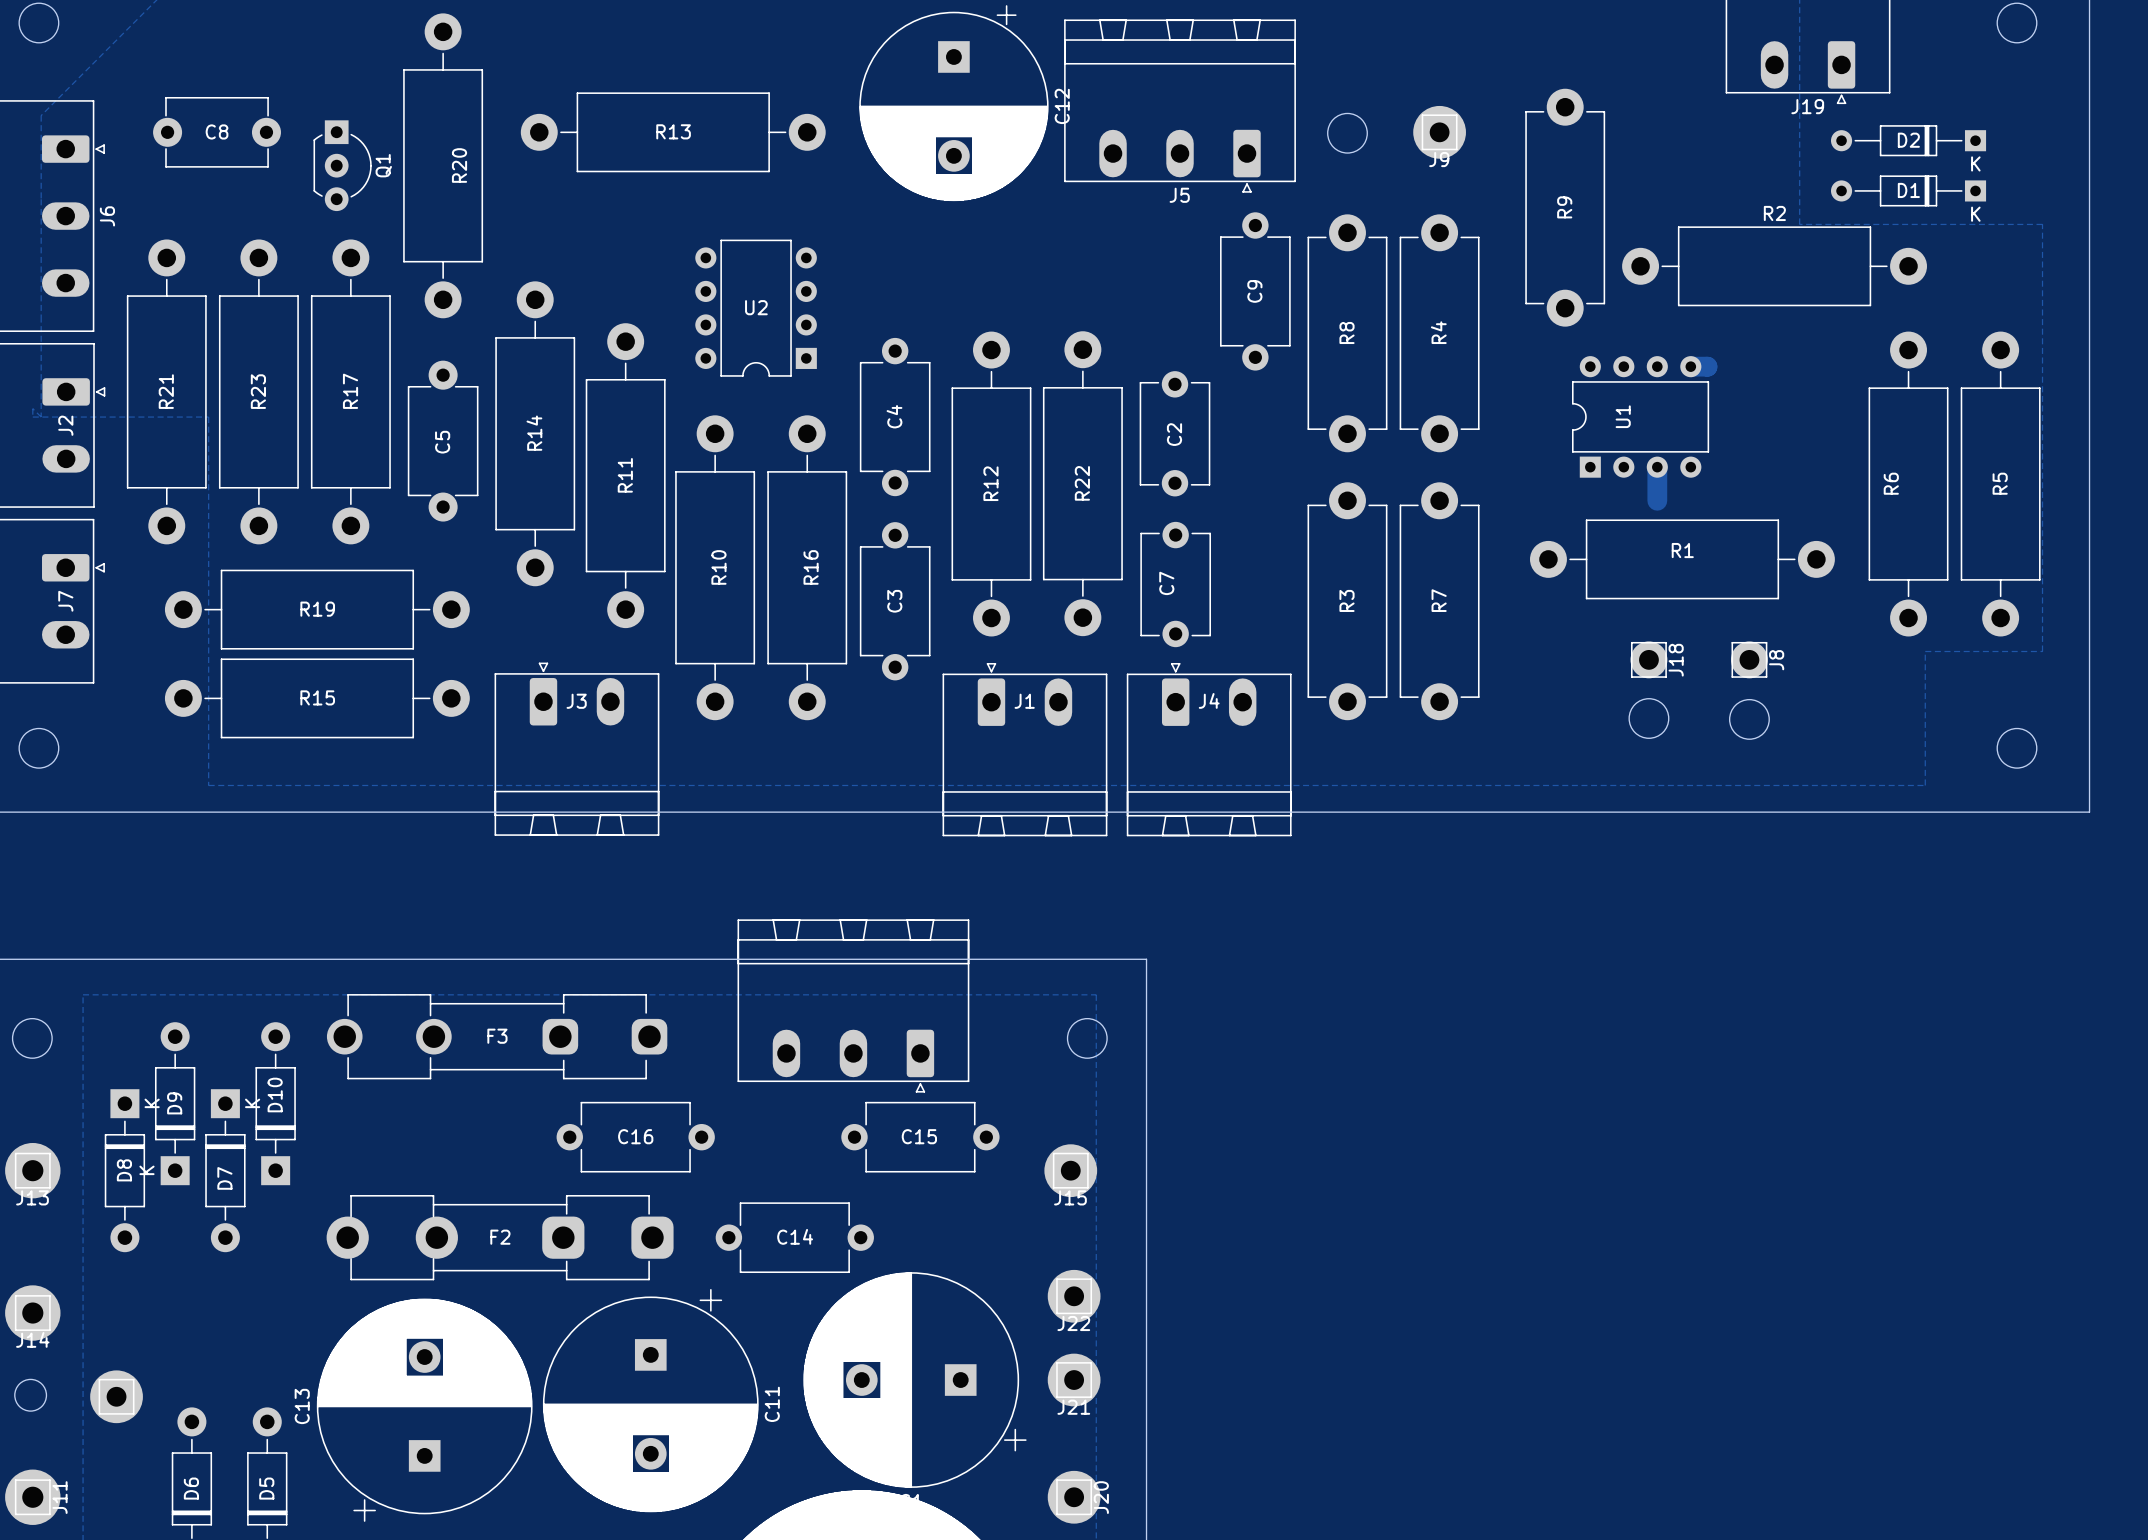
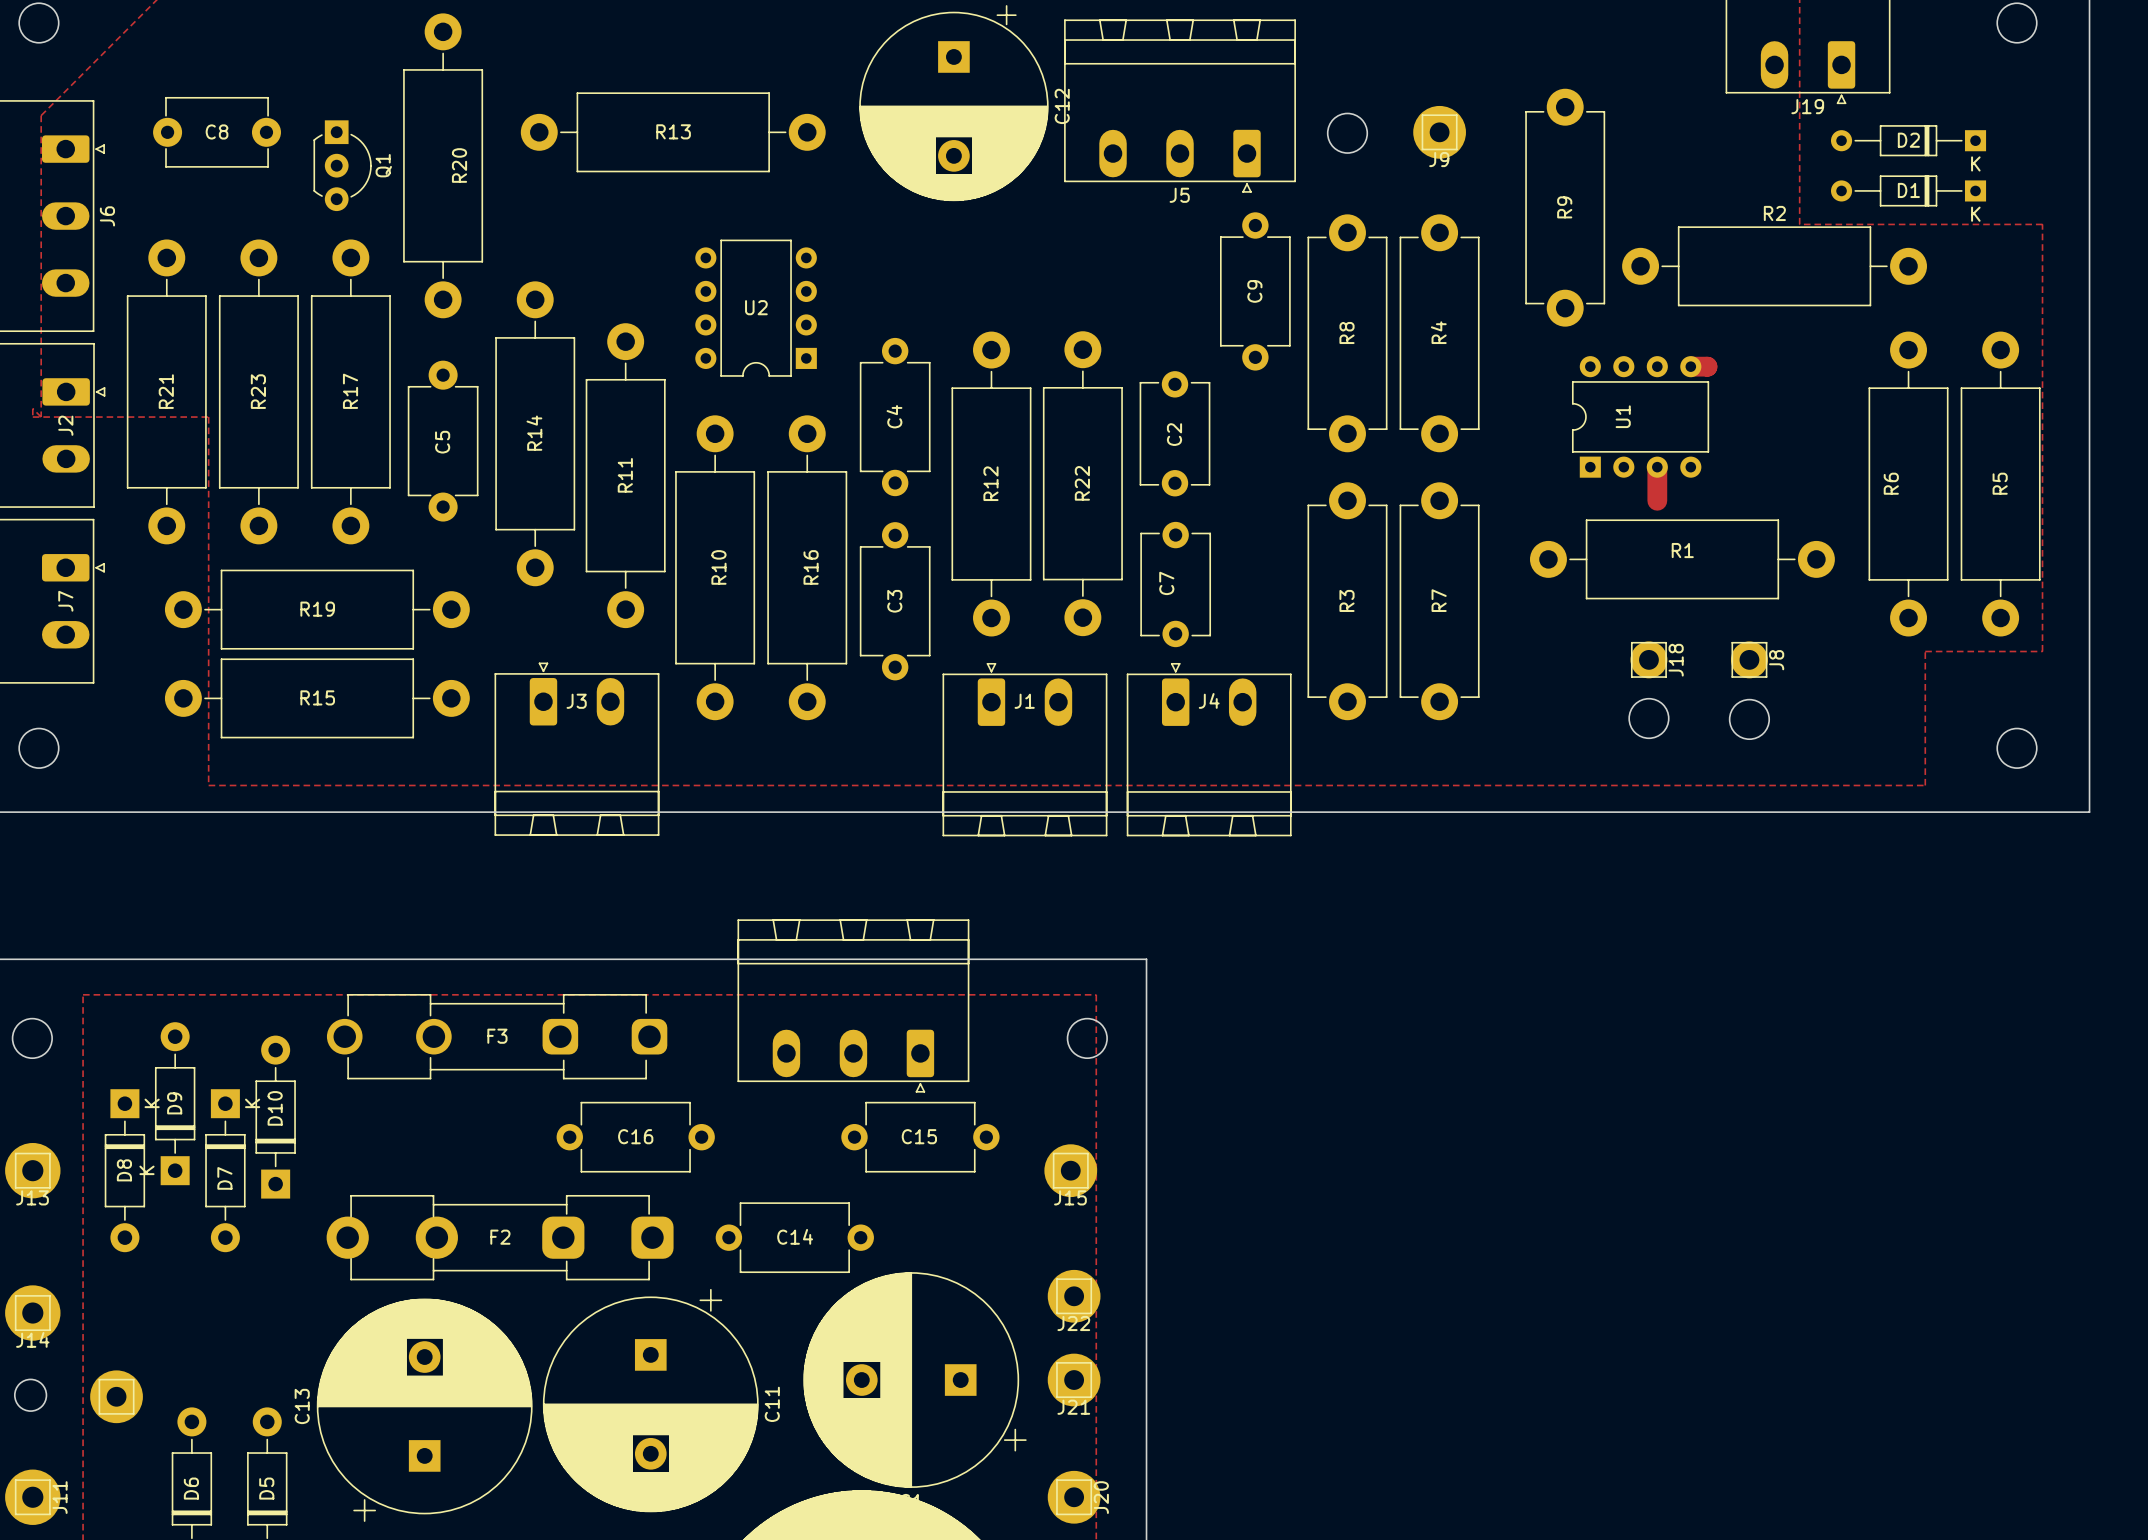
D10 position: (275, 1103) -> (275, 1117)

